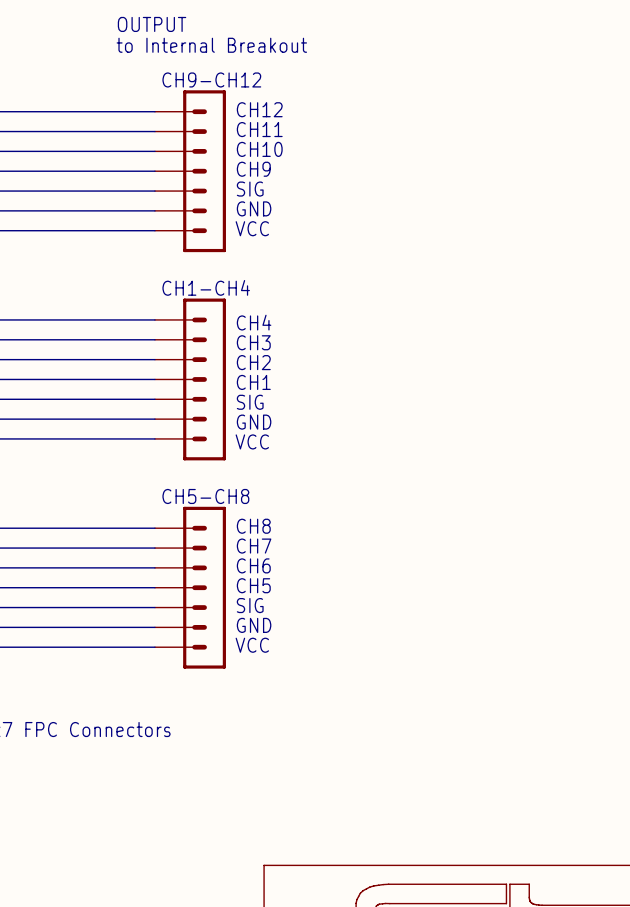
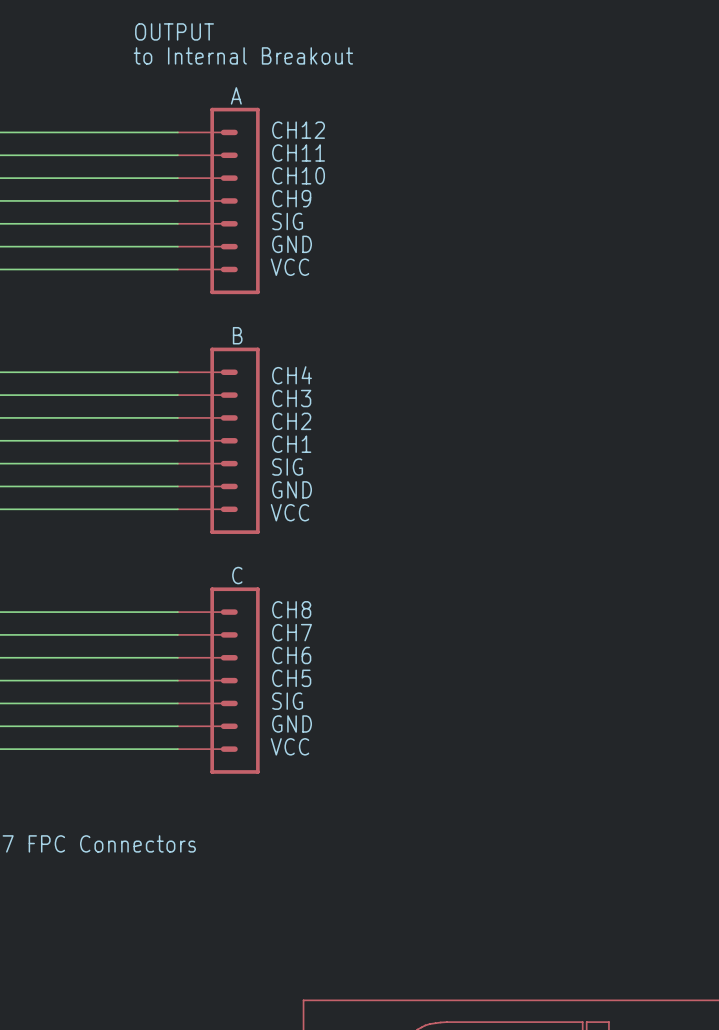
text: none -> A (236, 95)
text: CH9-CH12 (211, 79) -> none
text: CH1-CH4 (206, 287) -> none
text: none -> B (237, 335)
text: CH5-CH8 (205, 496) -> none
text: none -> C (237, 575)

